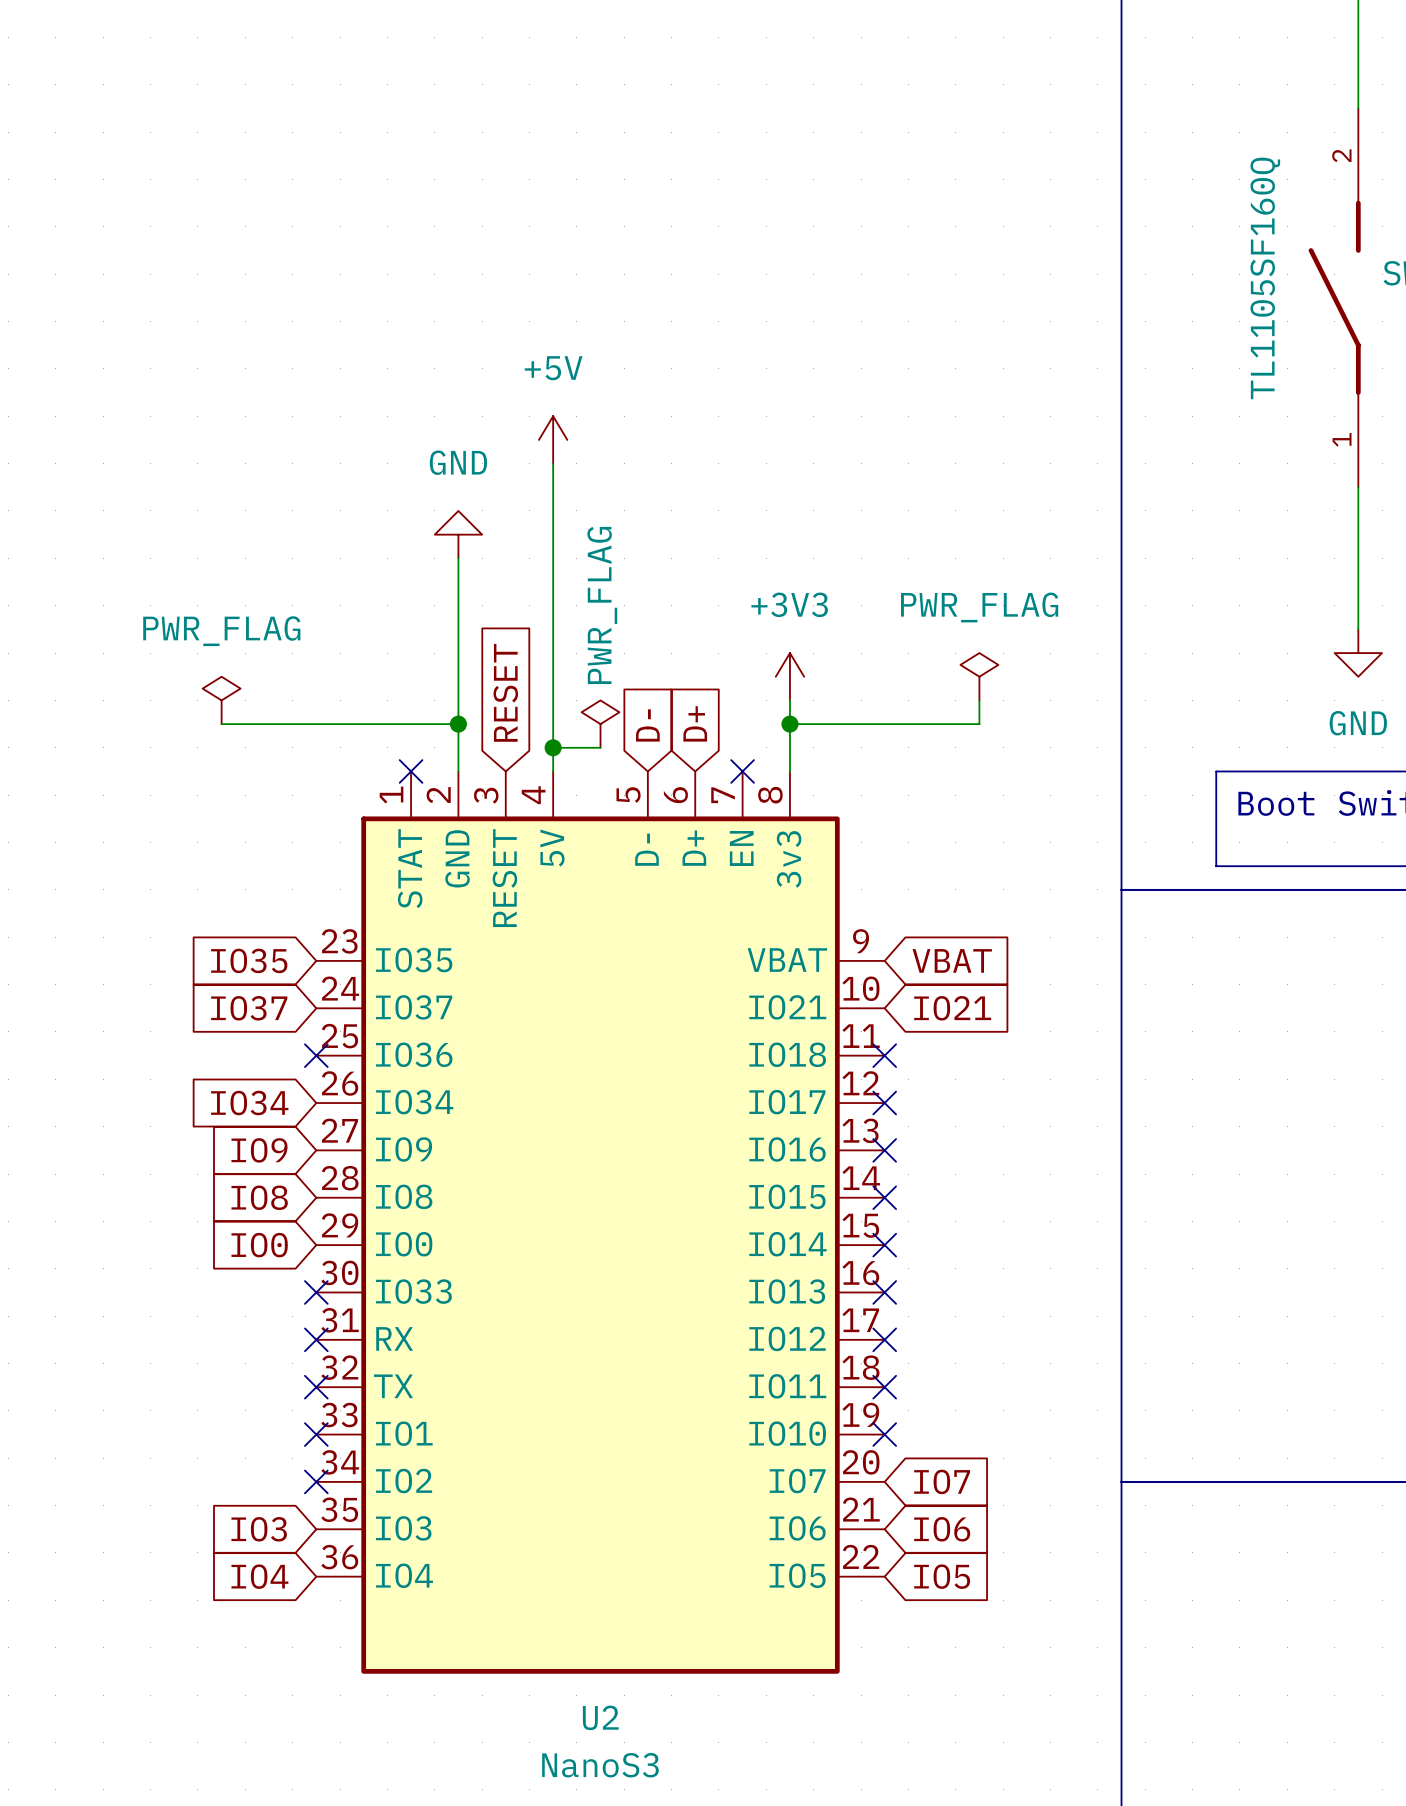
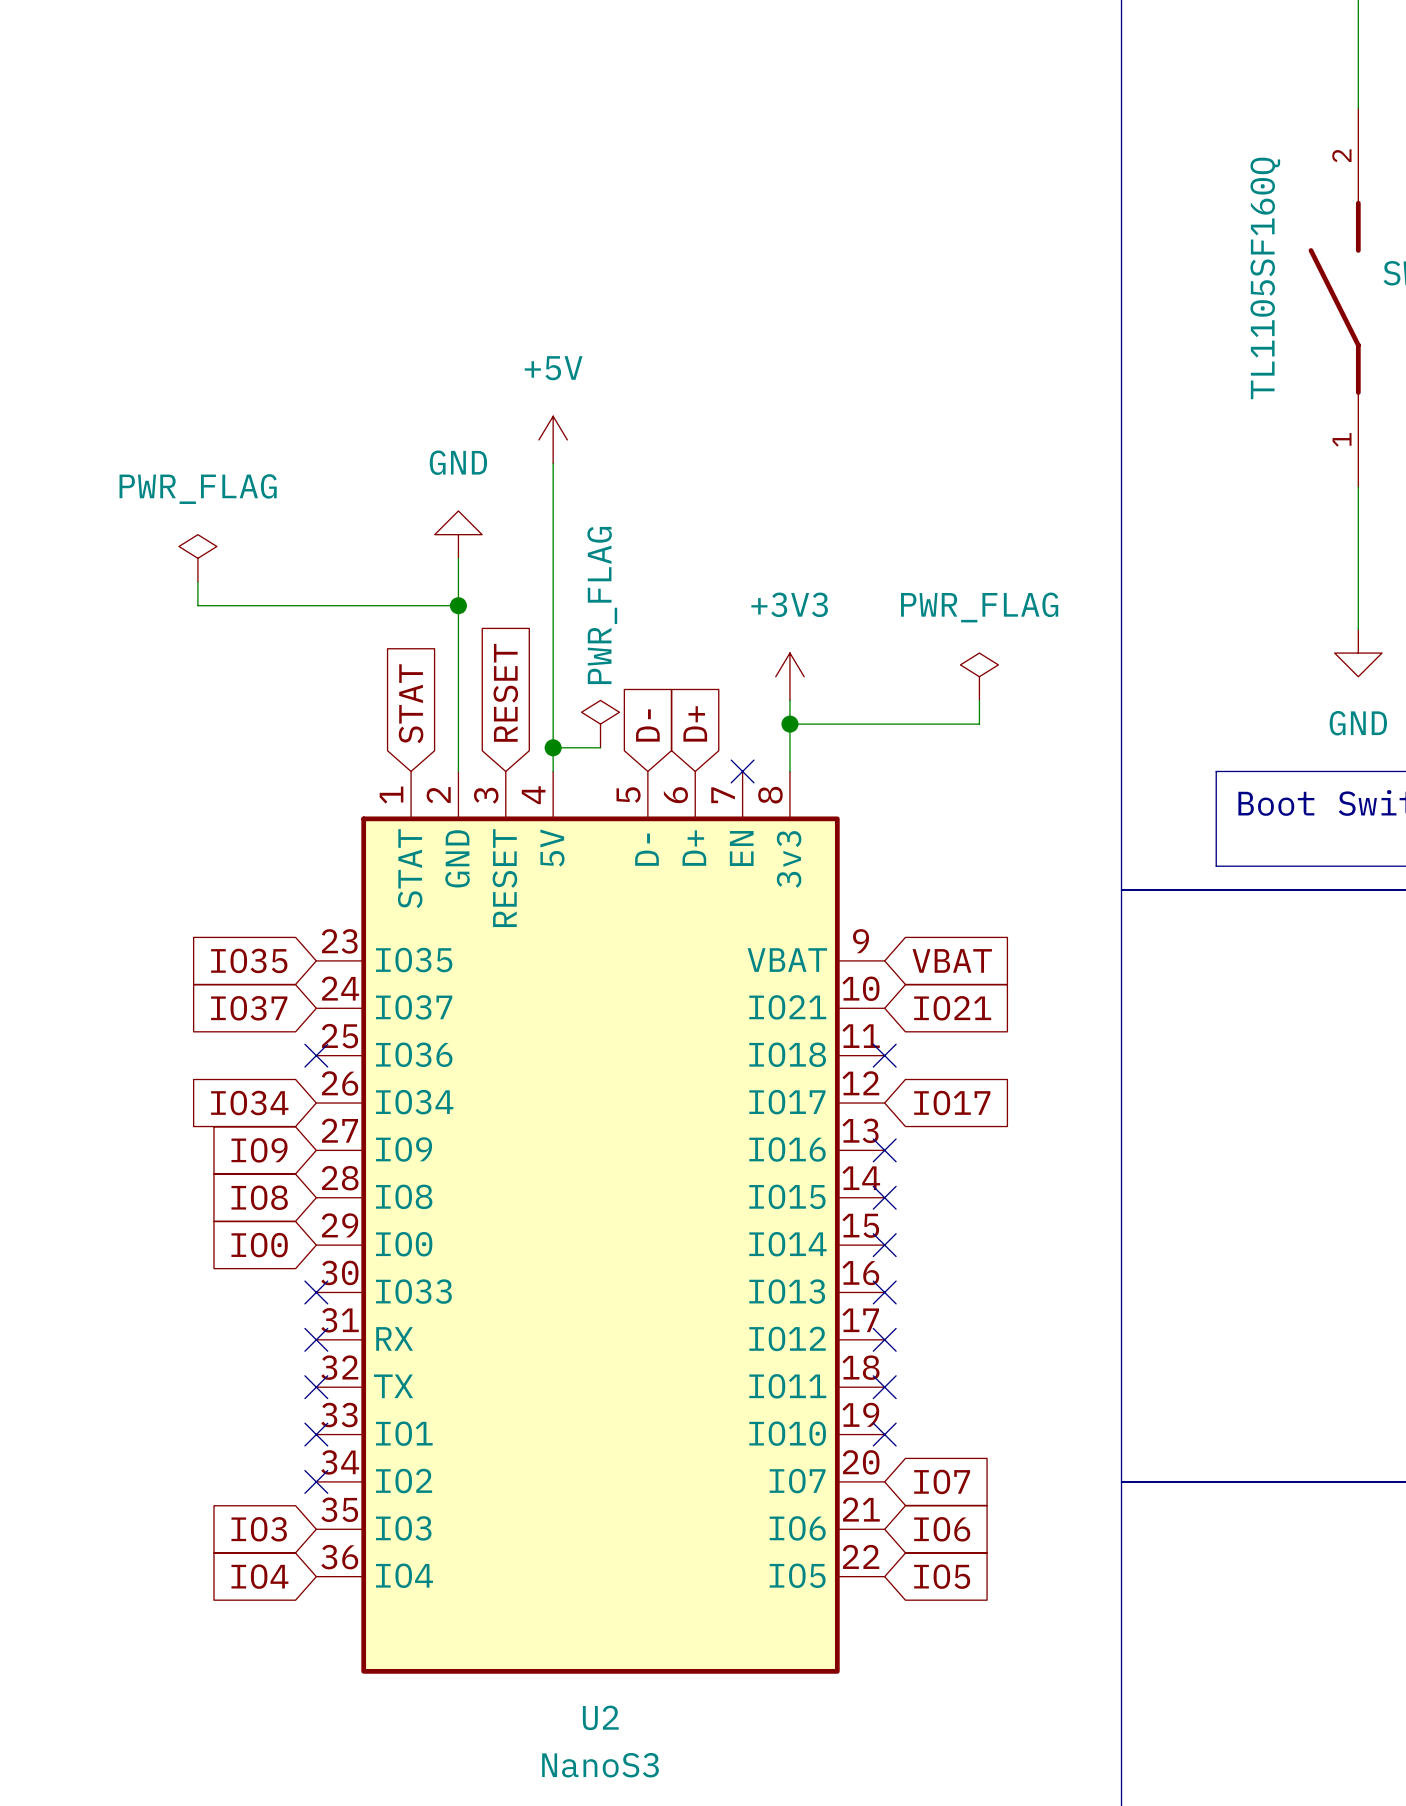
wire: none -> (197, 582) (197, 605) (458, 605)
junction: none -> (458, 605)
power symbol position: PWR_FLAG (221, 700) -> PWR_FLAG (197, 558)
global label: none -> STAT (411, 703)
wire: (221, 724) (458, 724) -> none
junction: (458, 724) -> none
no-connect mark: (411, 771) -> none
no-connect mark: (884, 1103) -> none
global label: none -> IO17 (952, 1103)

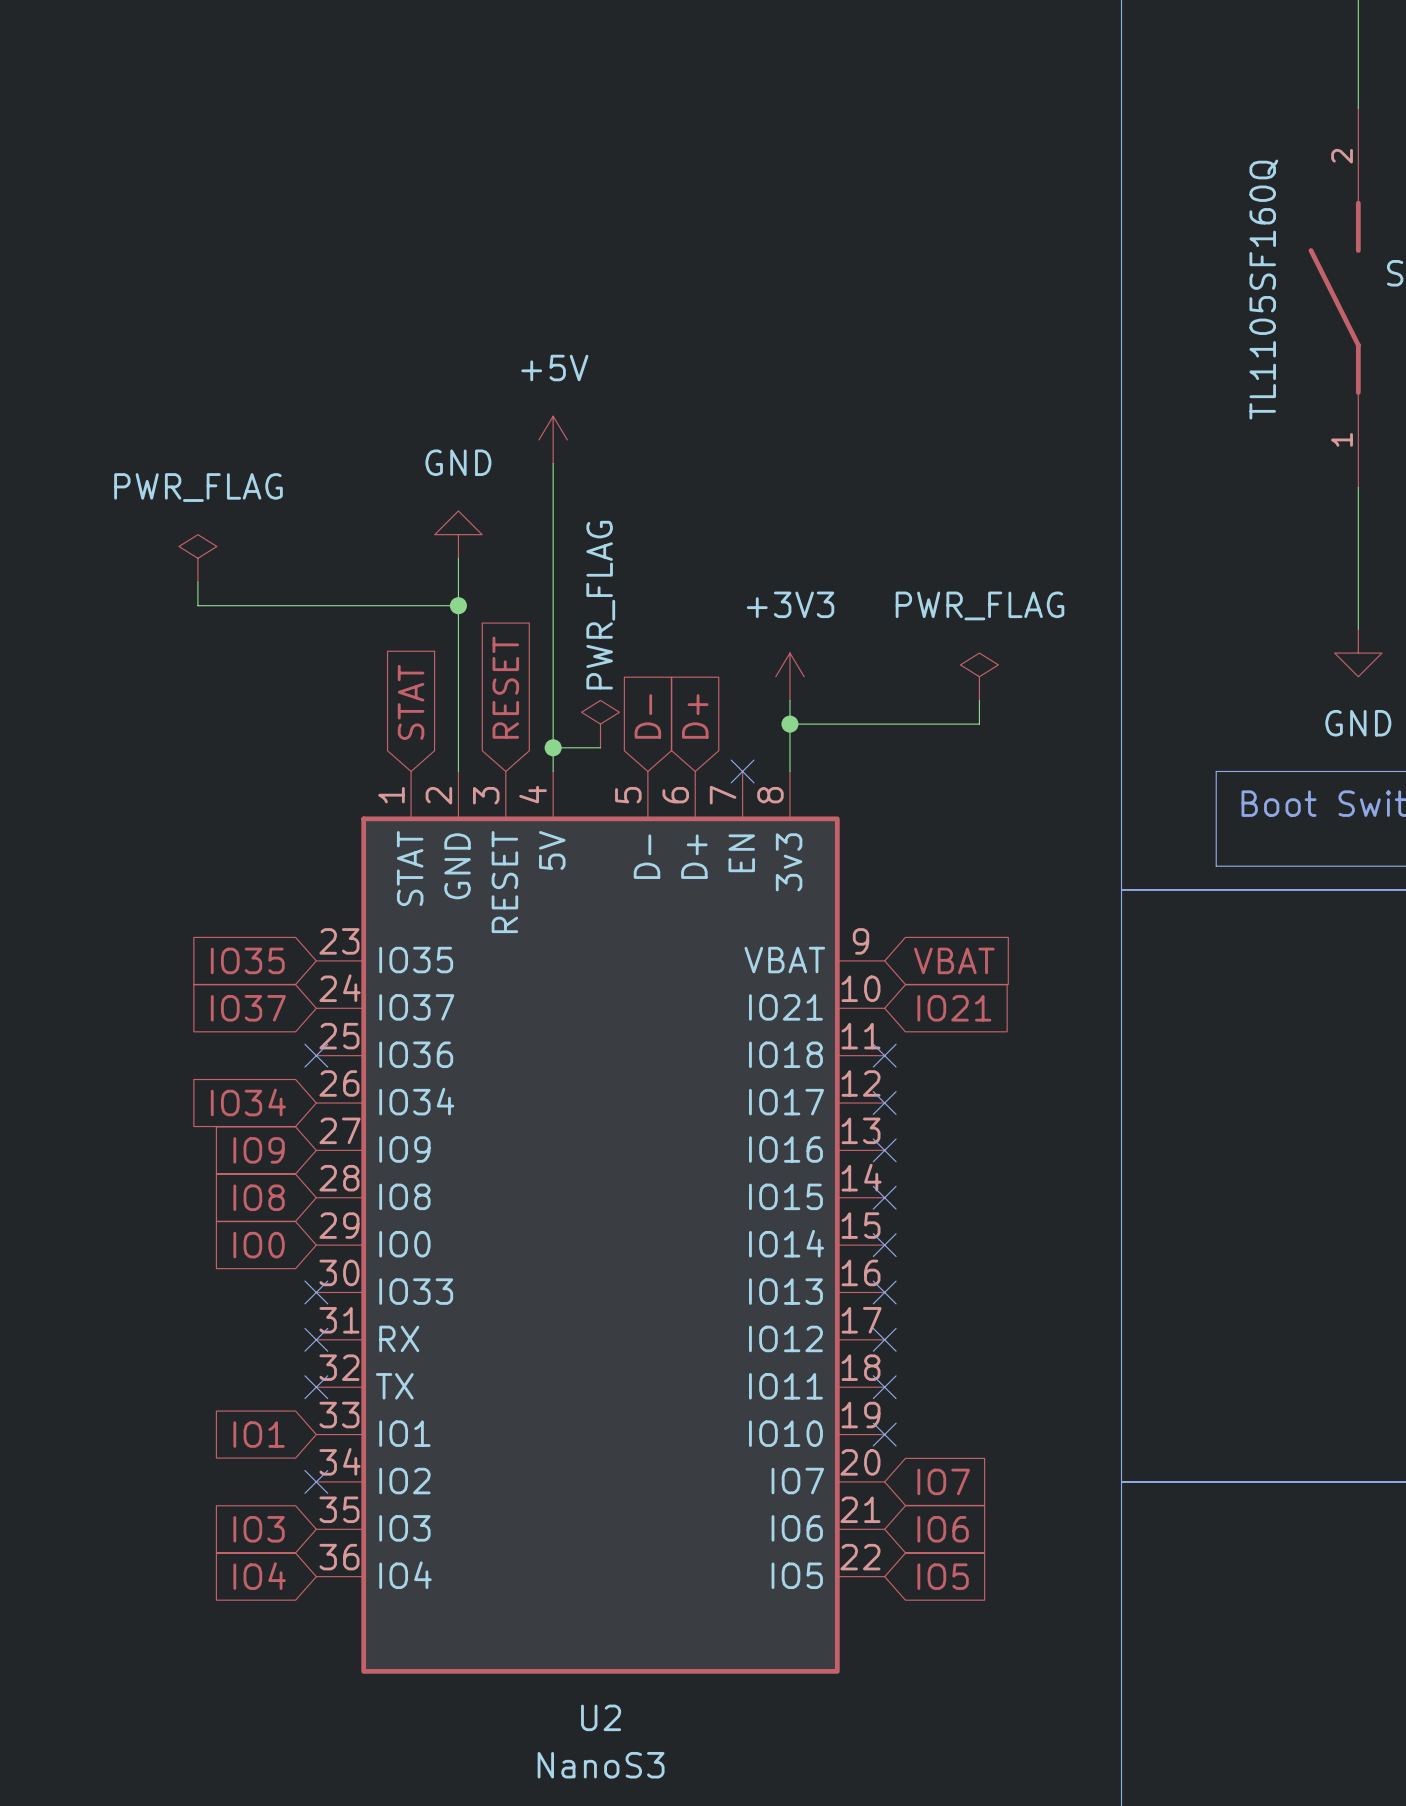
no-connect mark: none -> (884, 1103)
global label: IO17 (952, 1103) -> none
global label: none -> IO1 (259, 1434)
no-connect mark: (316, 1434) -> none

